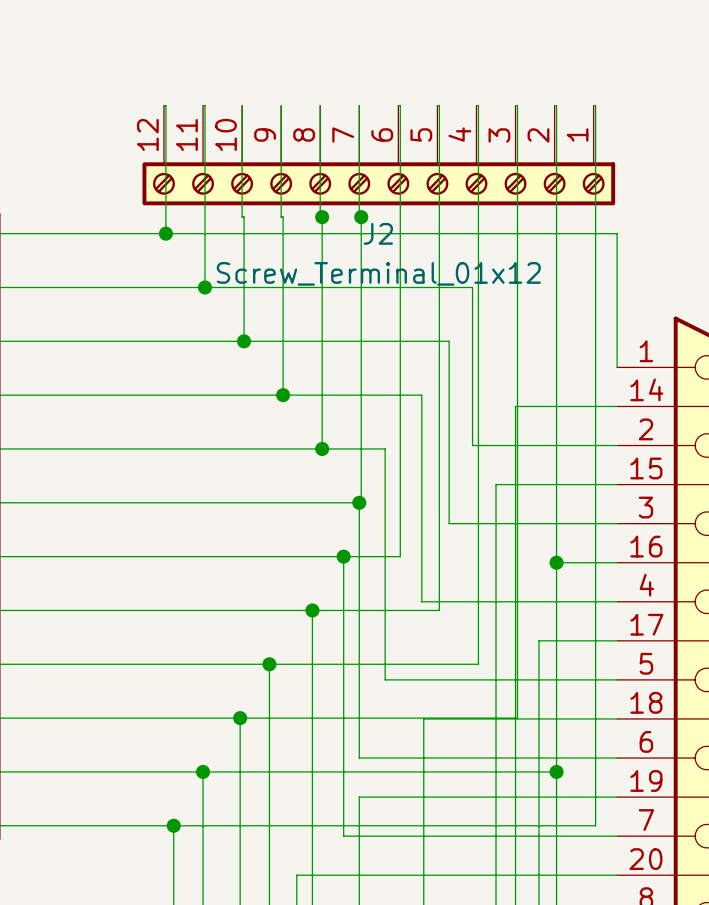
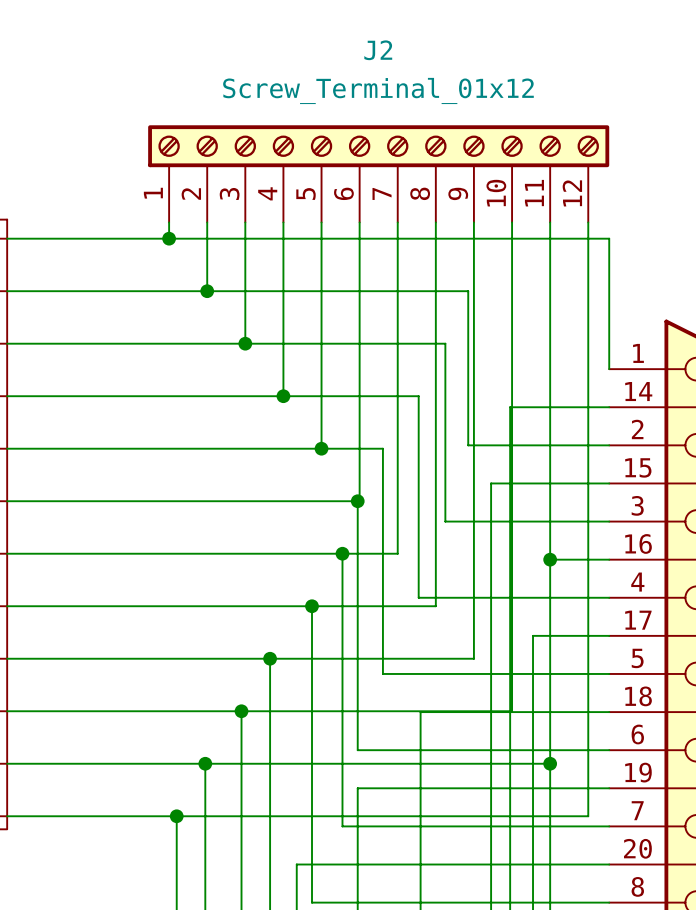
wire: (242, 105) (242, 217) (244, 217) -> none
wire: (281, 105) (281, 217) (283, 217) -> none
wire: (320, 105) (320, 217) (322, 217) -> none
wire: (359, 105) (359, 217) (361, 217) -> none
J2 rotation: 0° (378, 183) -> 180° (378, 146)
junction: (322, 217) -> none
junction: (361, 217) -> none
J2 name position: J2 (378, 233) -> J2 (378, 50)
J2 value position: Screw_Terminal_01x12 (378, 273) -> Screw_Terminal_01x12 (378, 90)

